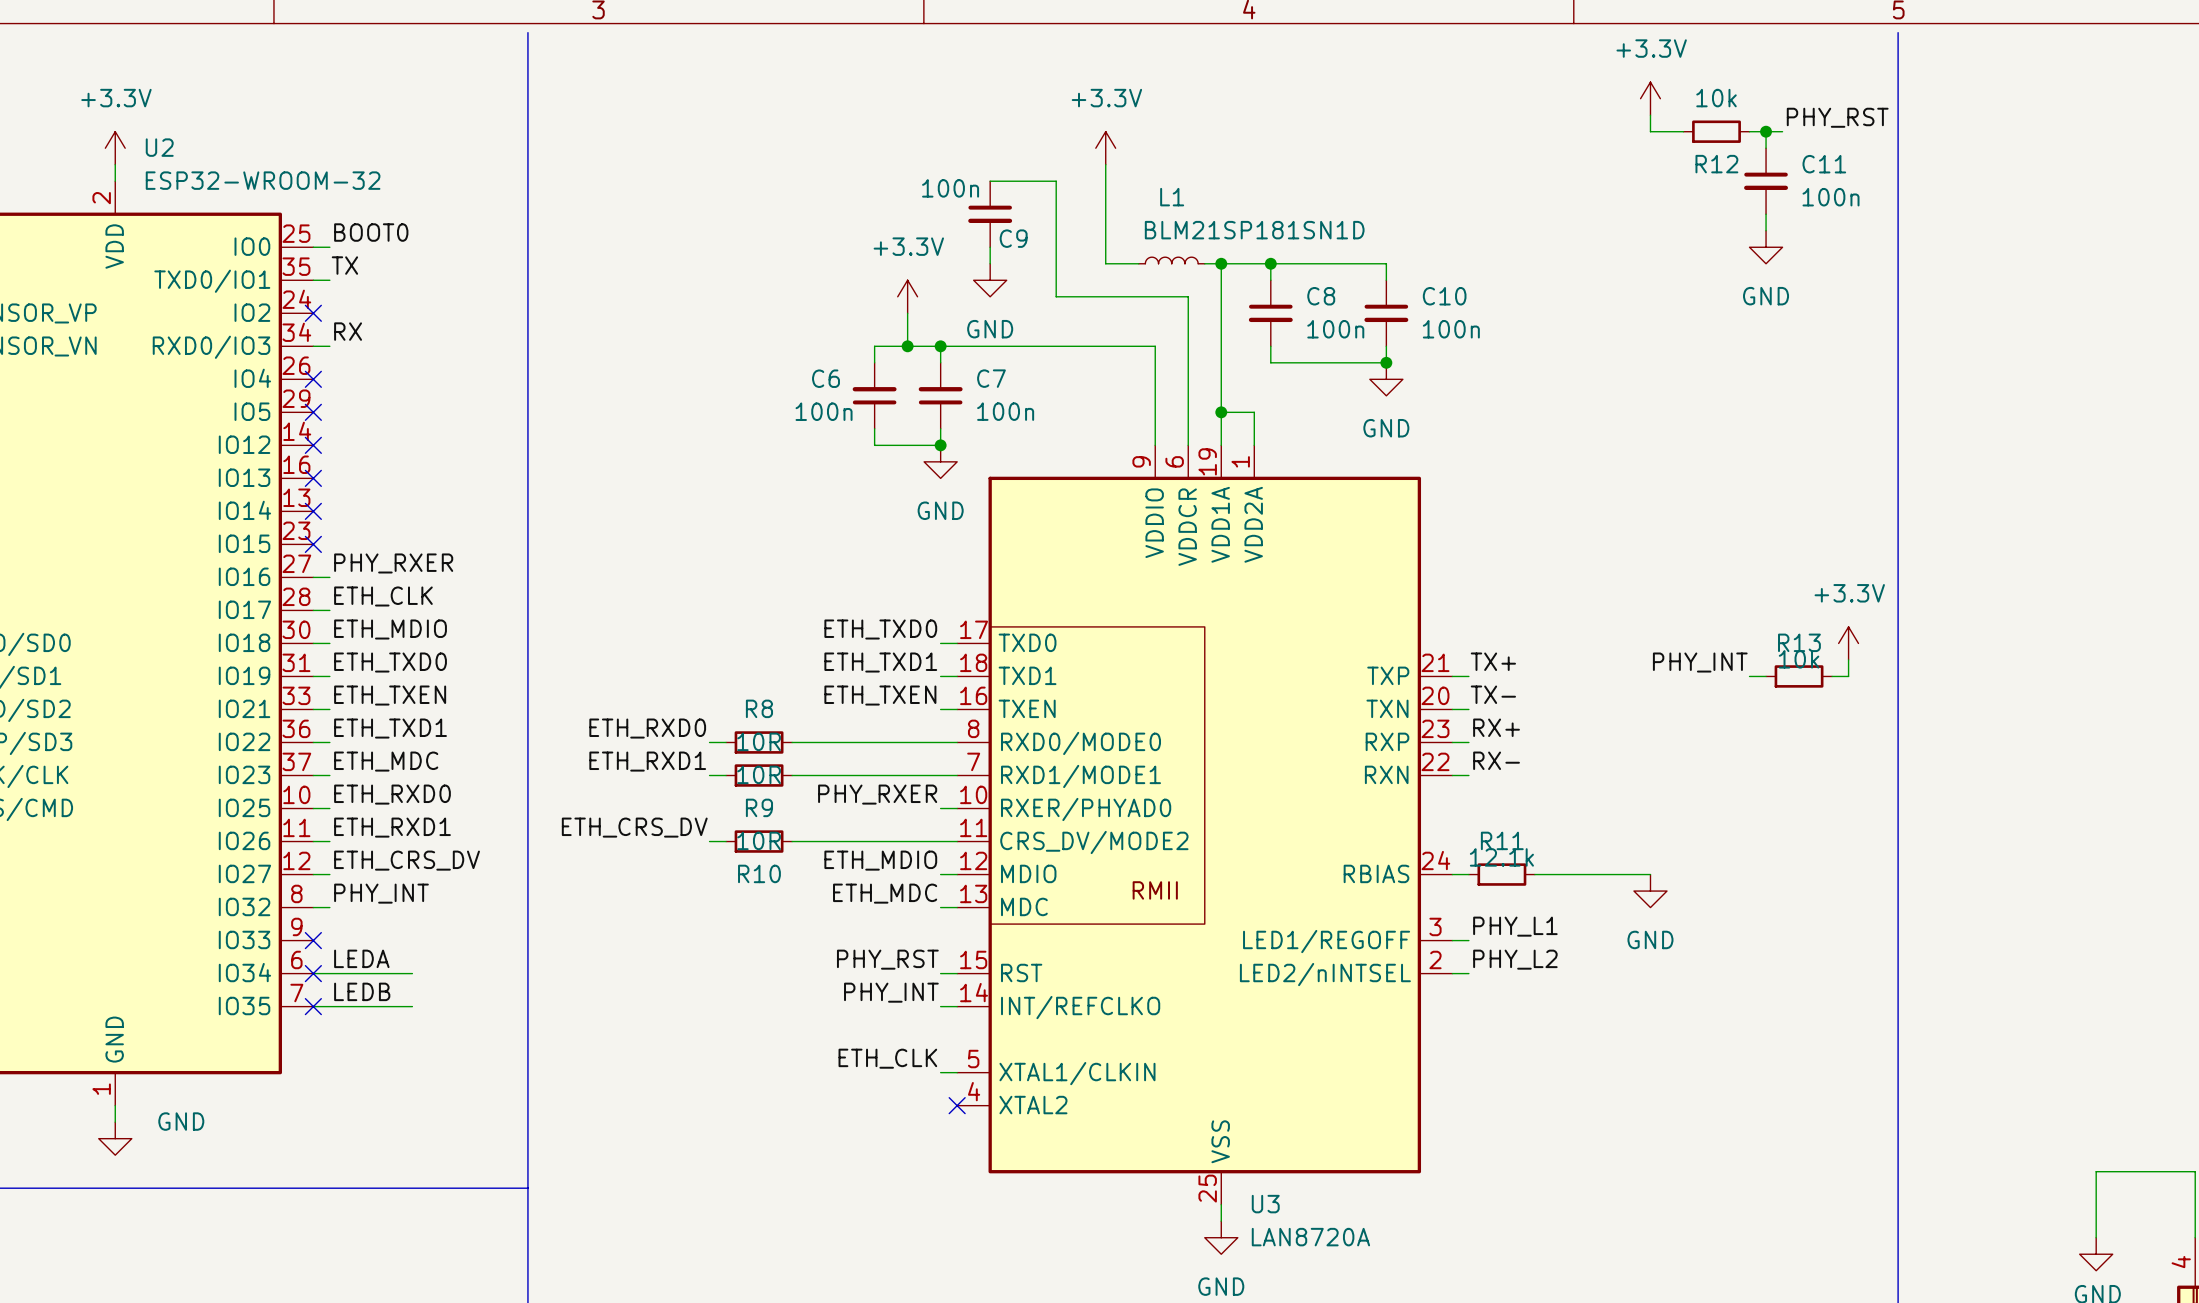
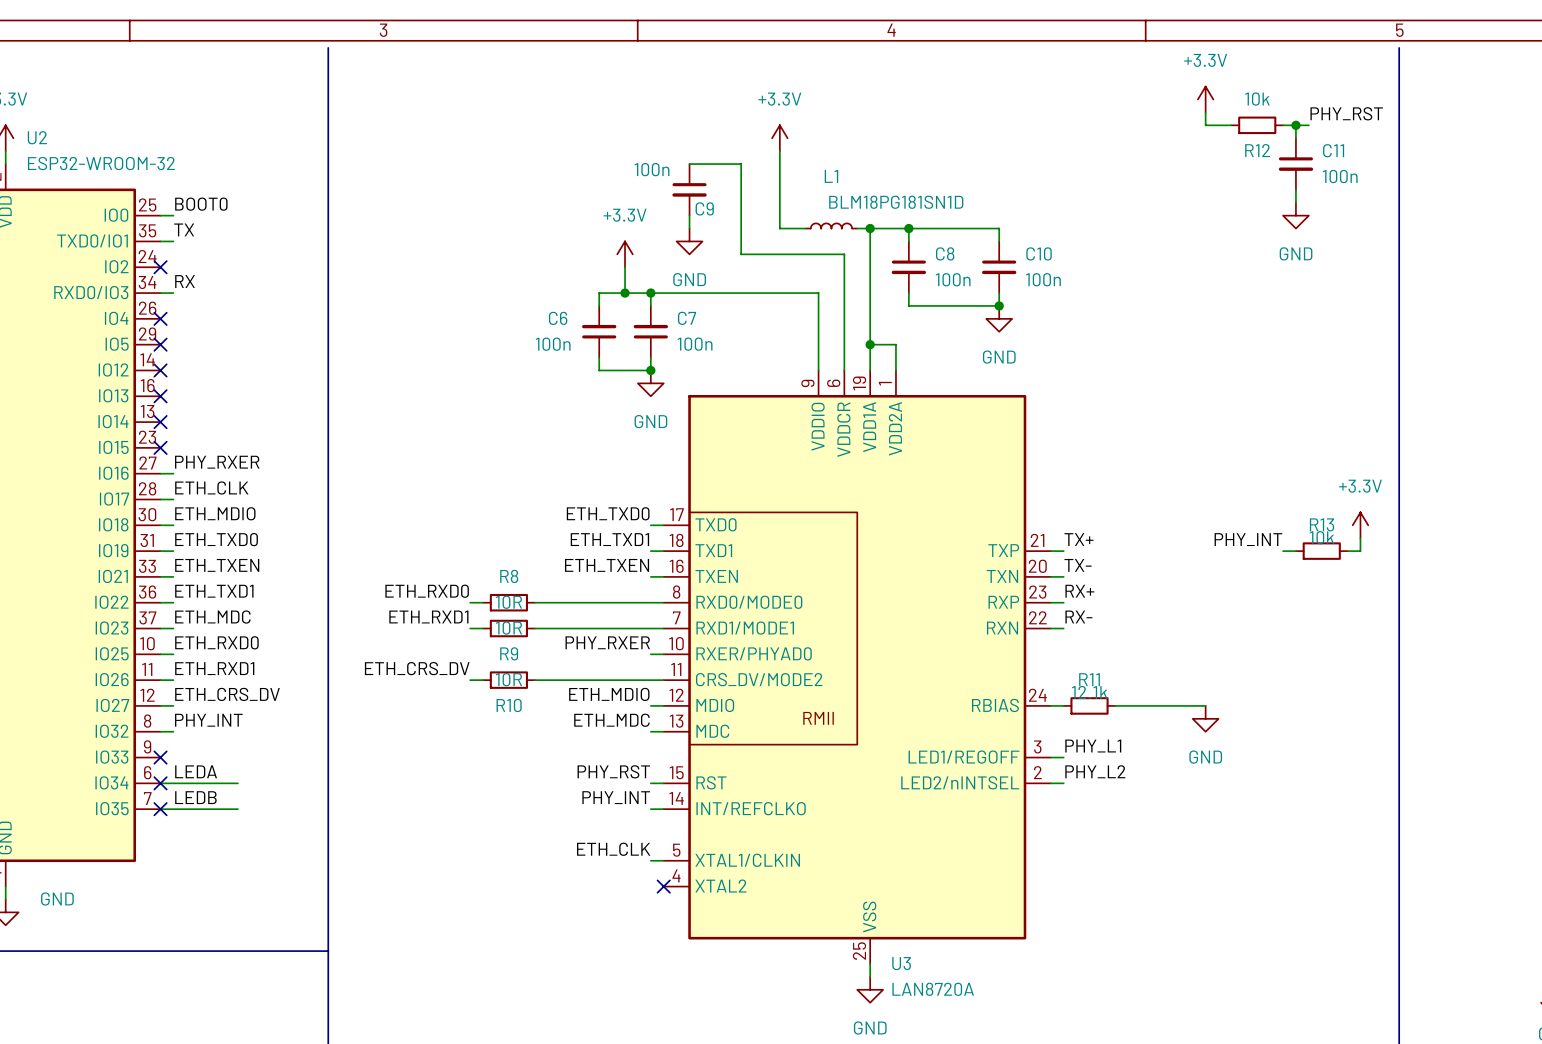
L1 value: BLM21SP181SN1D (1254, 230) -> BLM18PG181SN1D (896, 202)

